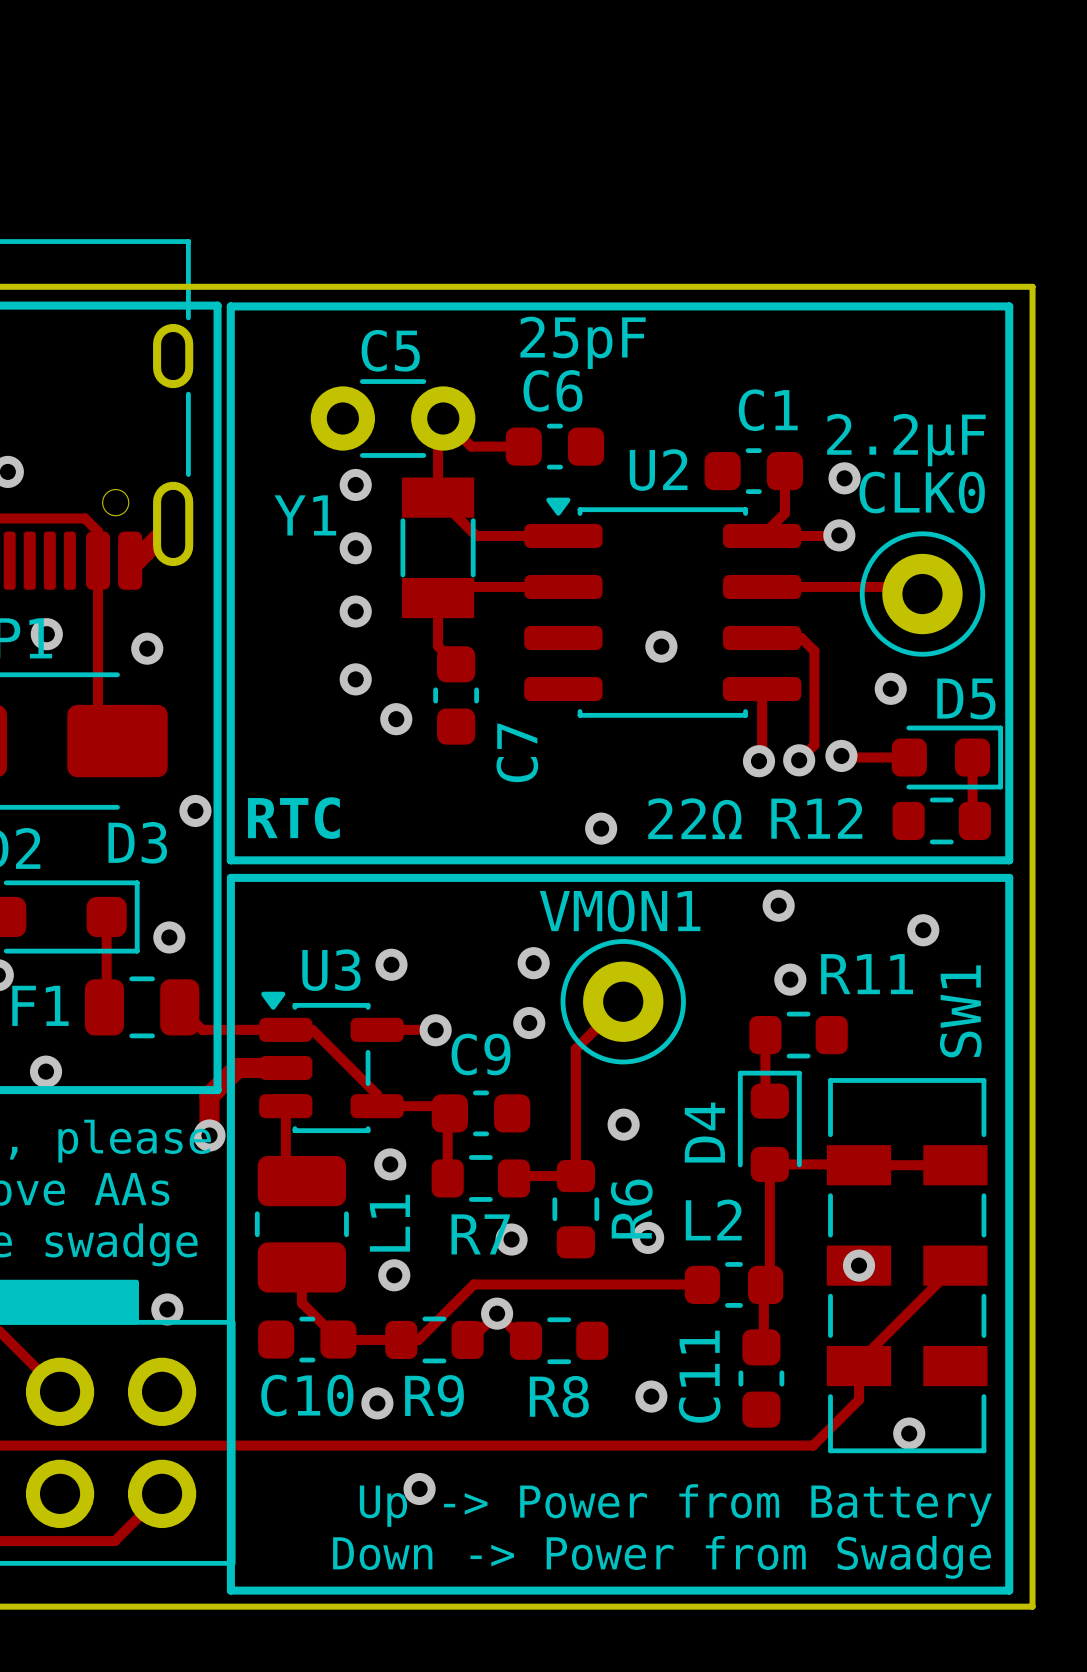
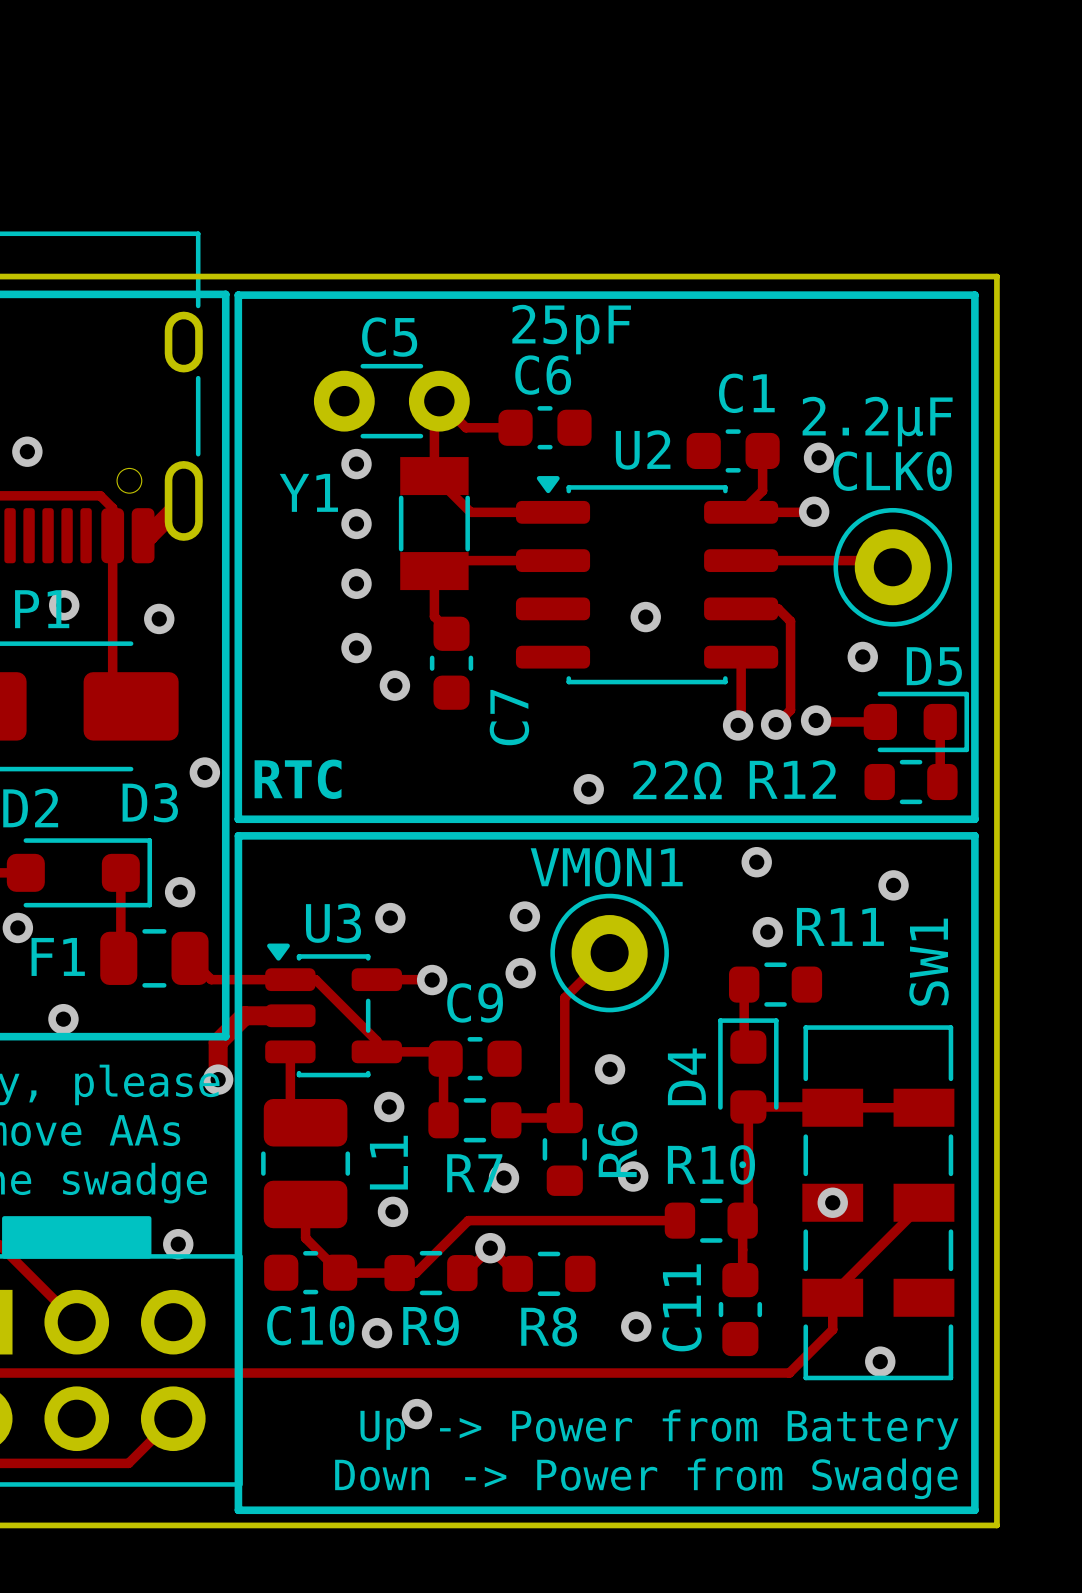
R10: none -> (711, 1220)
L2: (733, 1284) -> none

